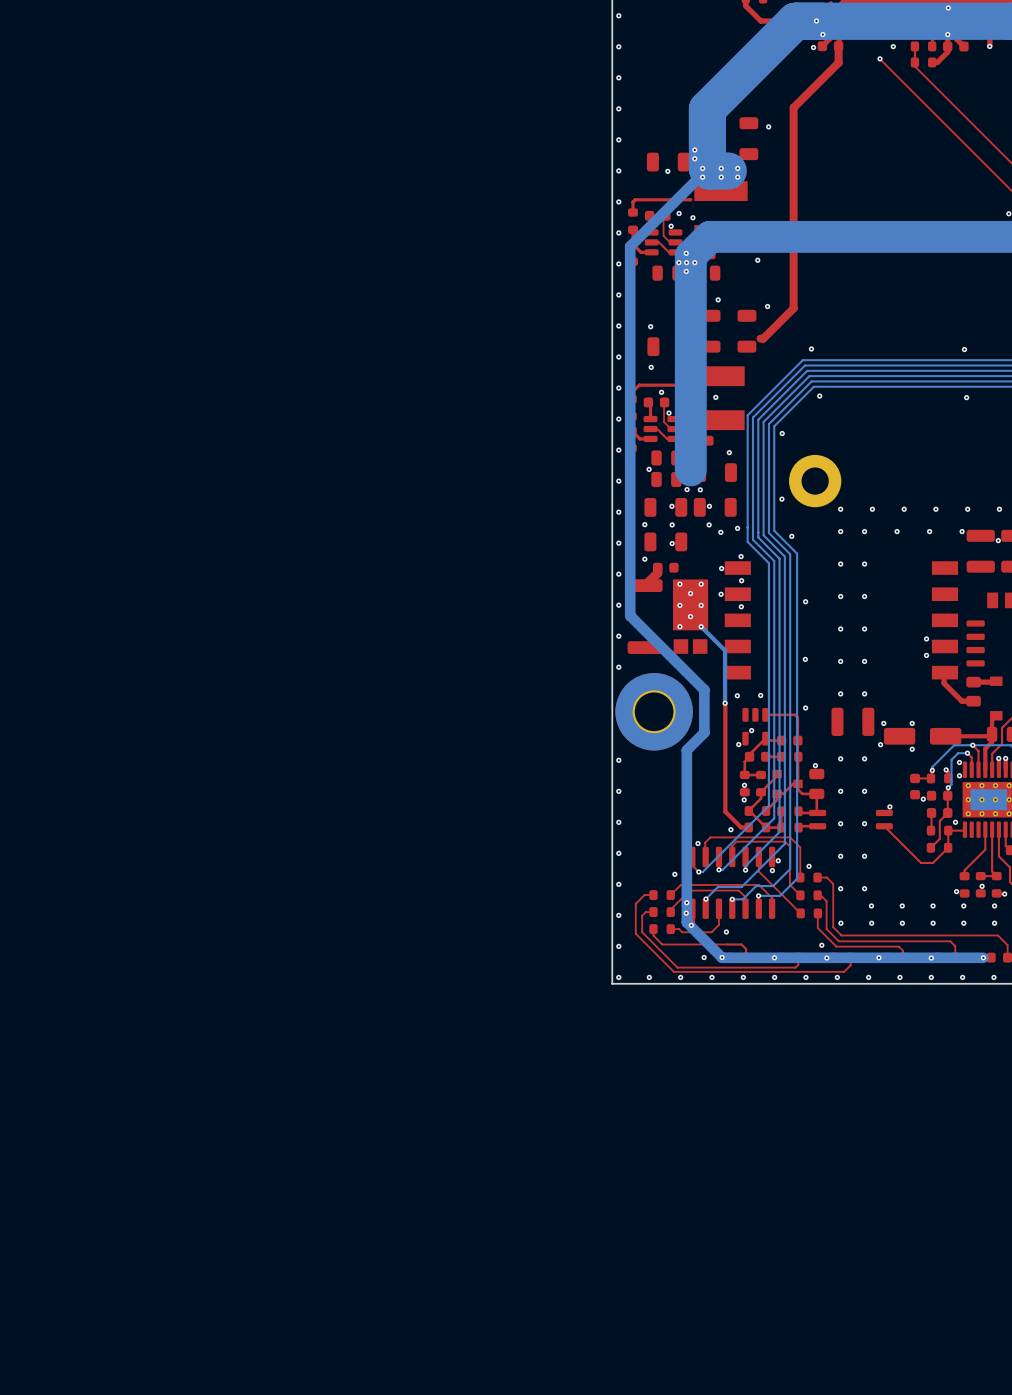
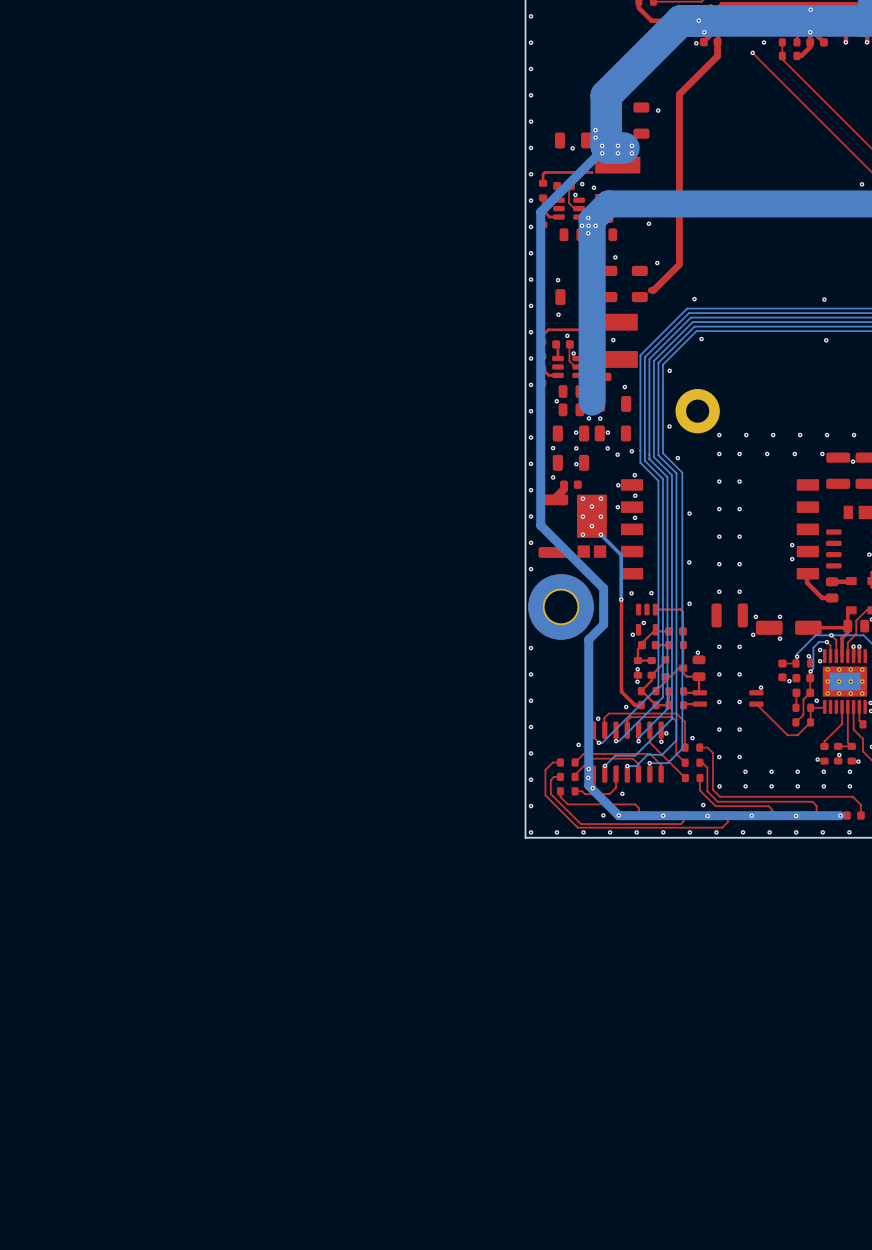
top track: (651, 242) (658, 242) (668, 252) (675, 252) -> none
top track: (650, 429) (657, 429) (667, 438) (674, 438) -> none

